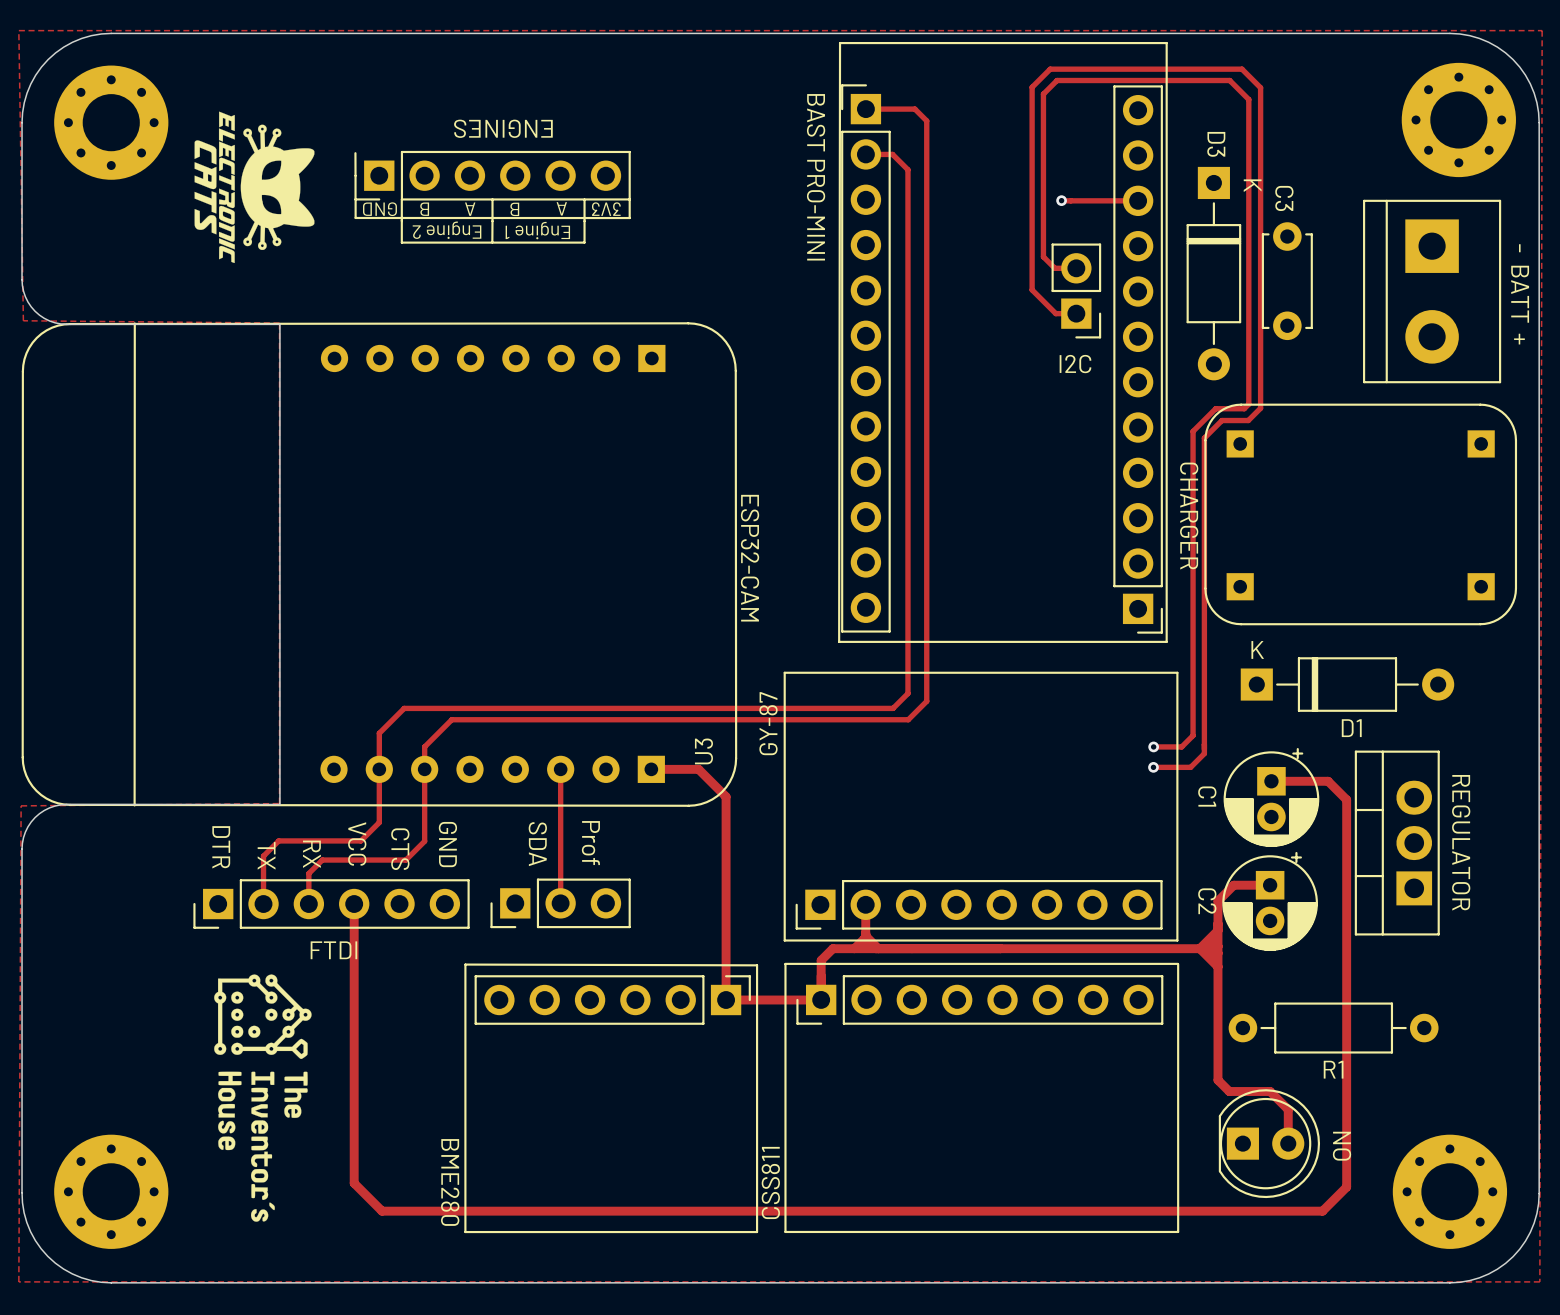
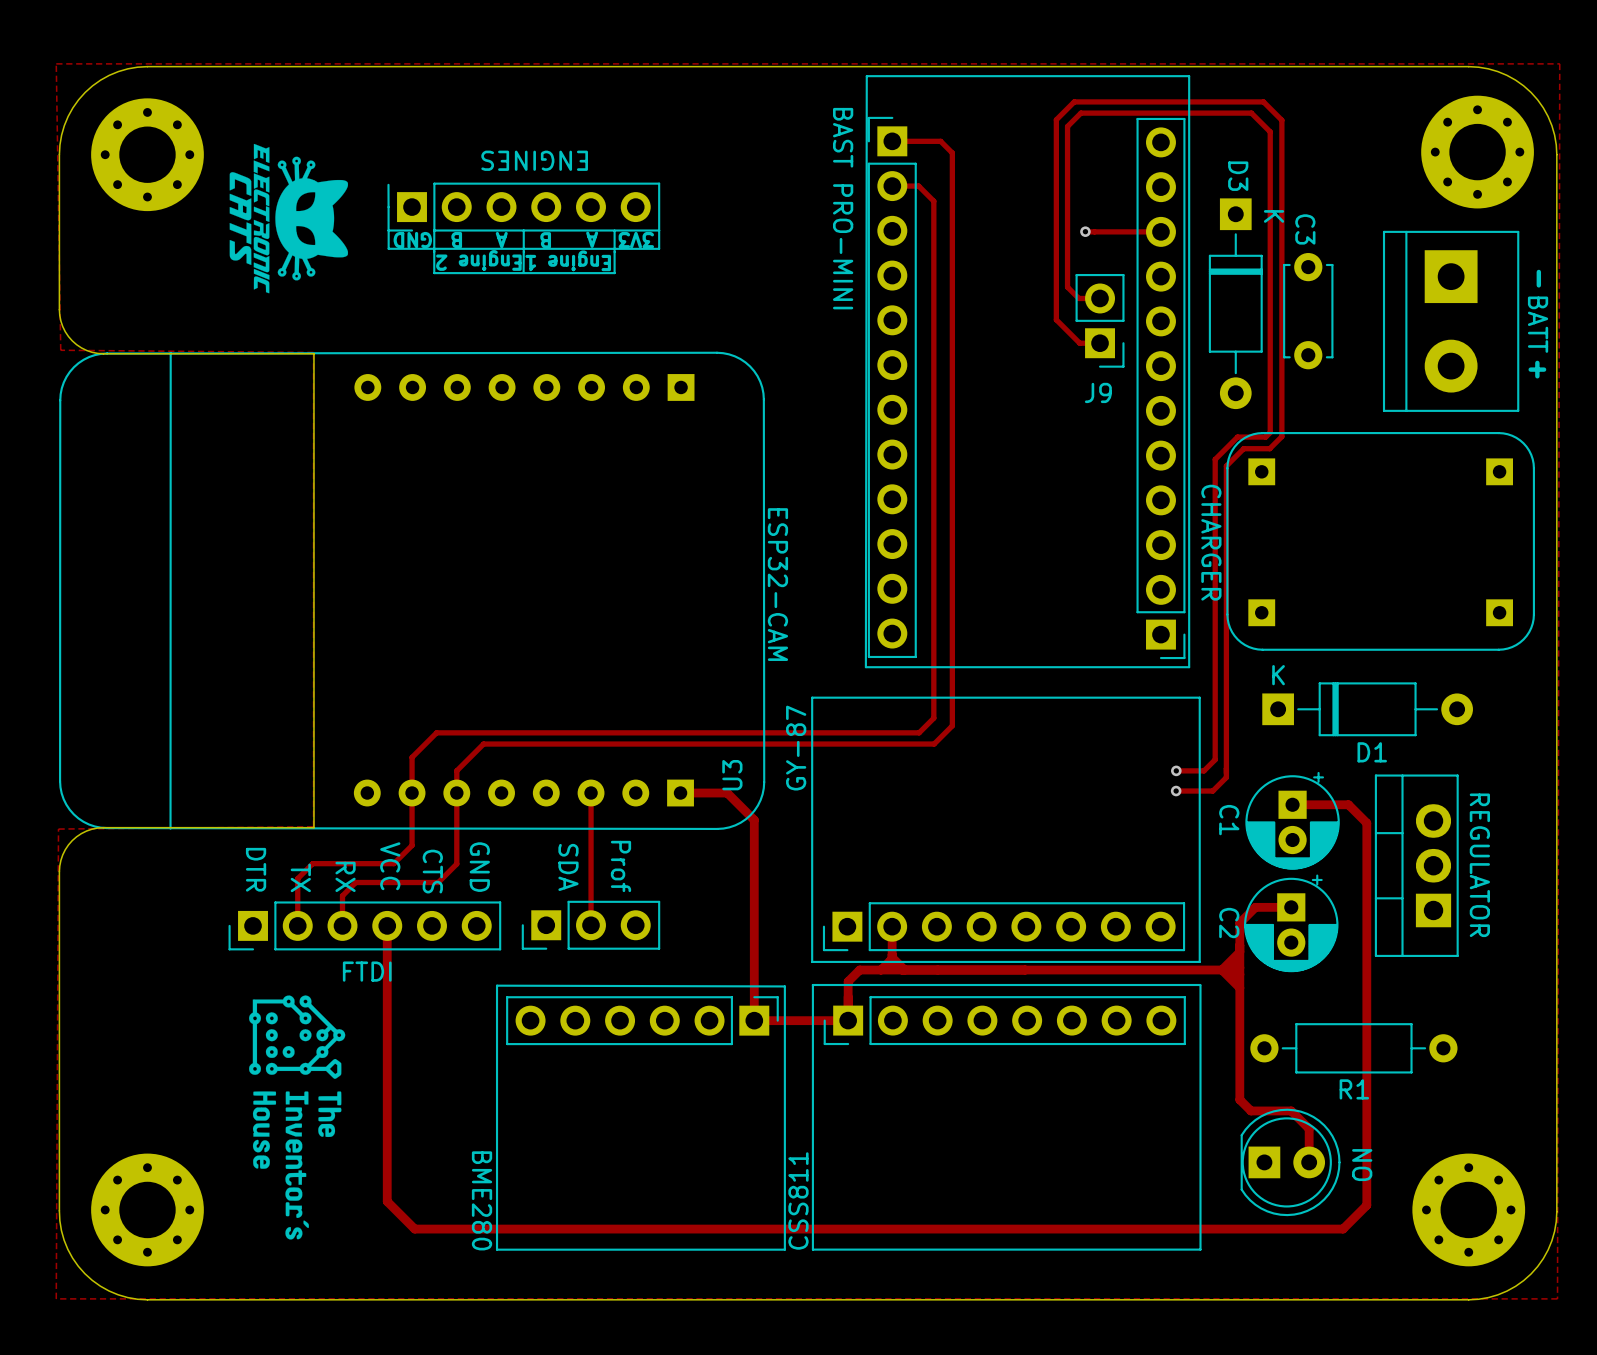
I2C name: I2C (1075, 364) -> J9 (1098, 392)

